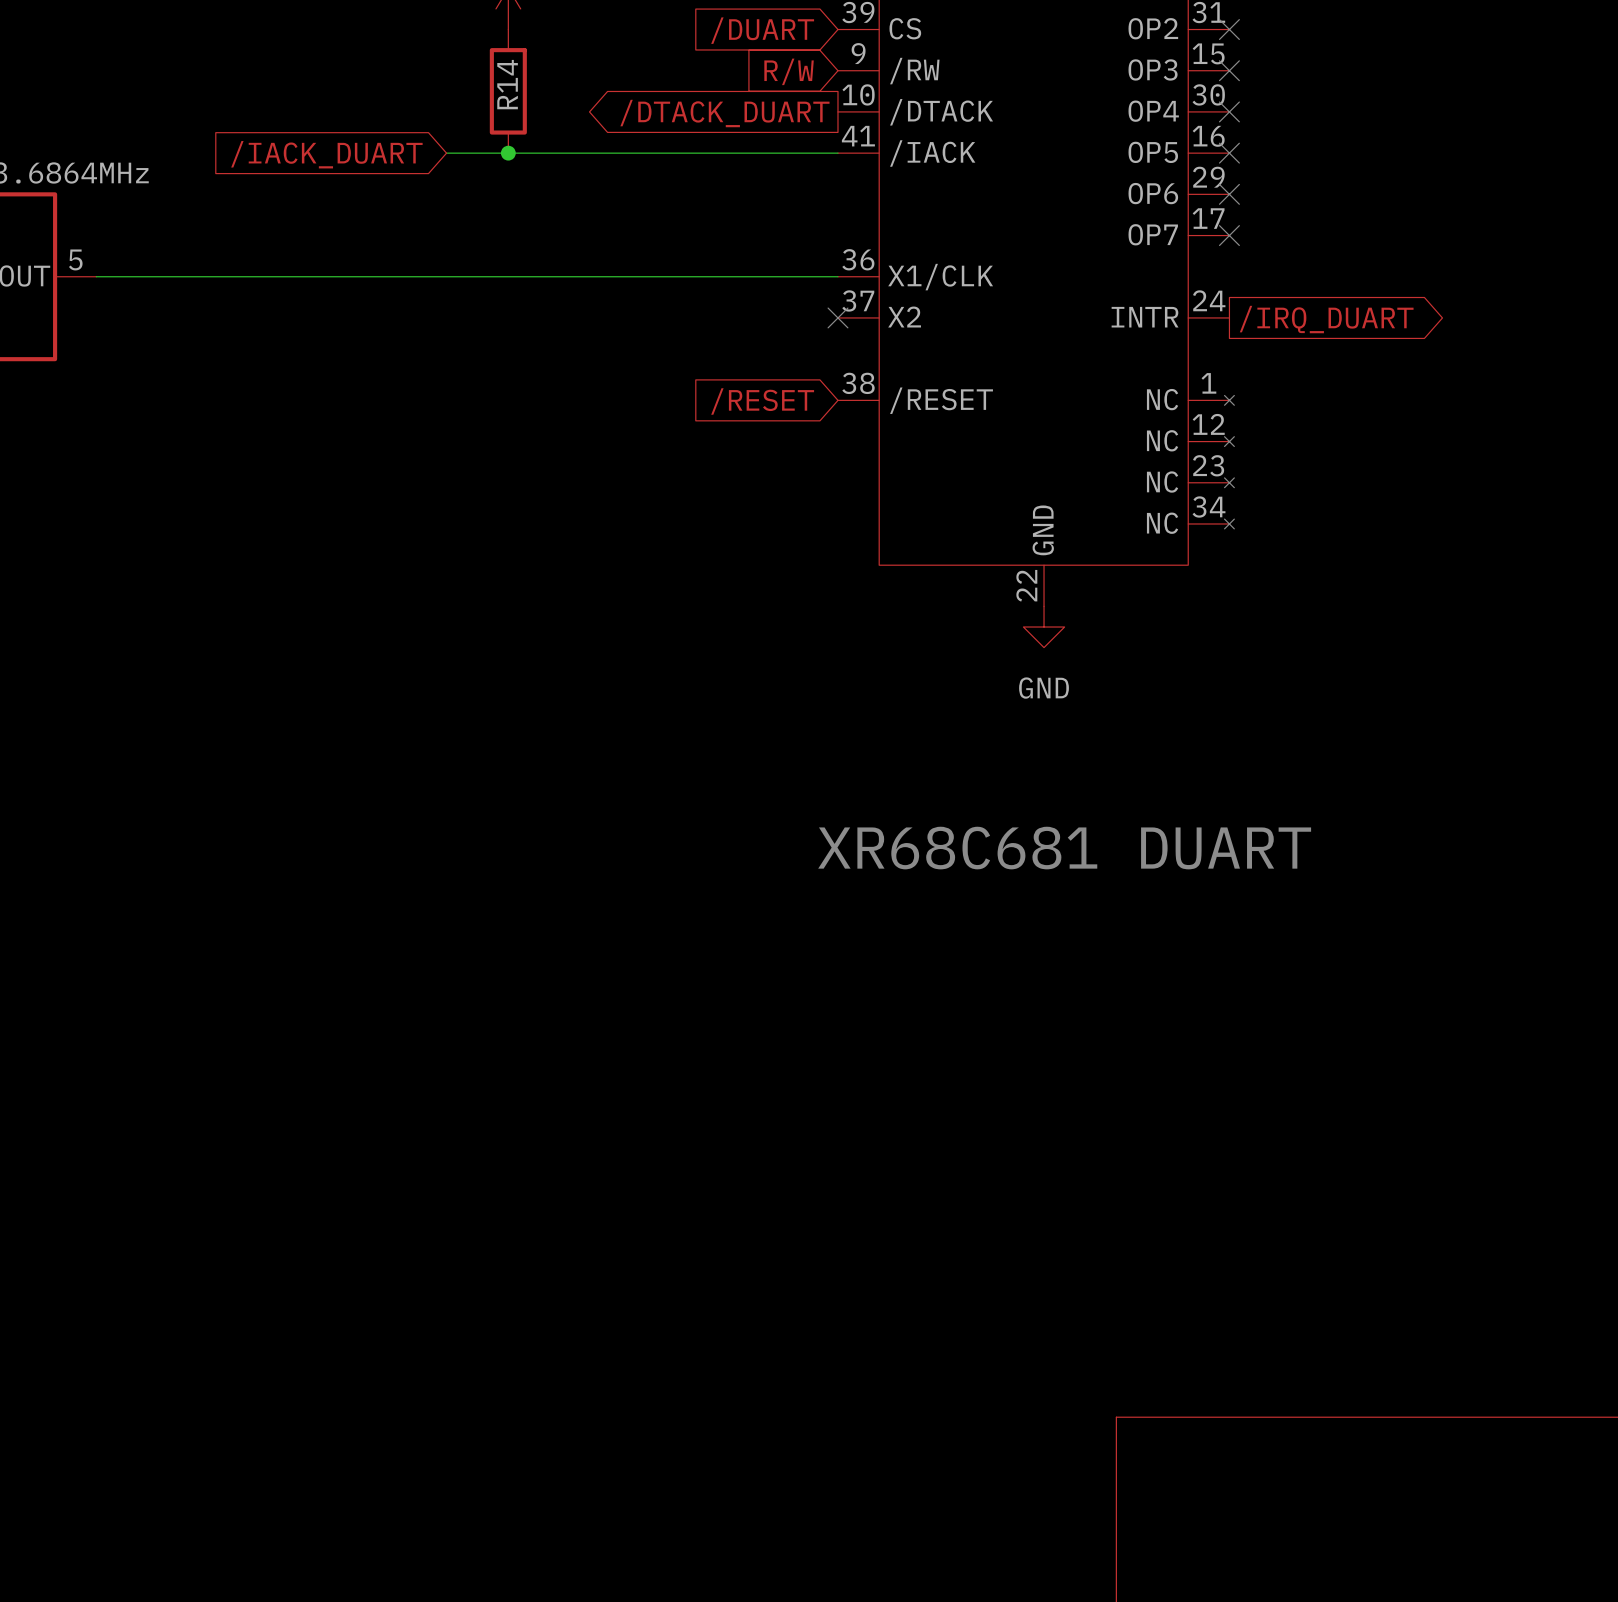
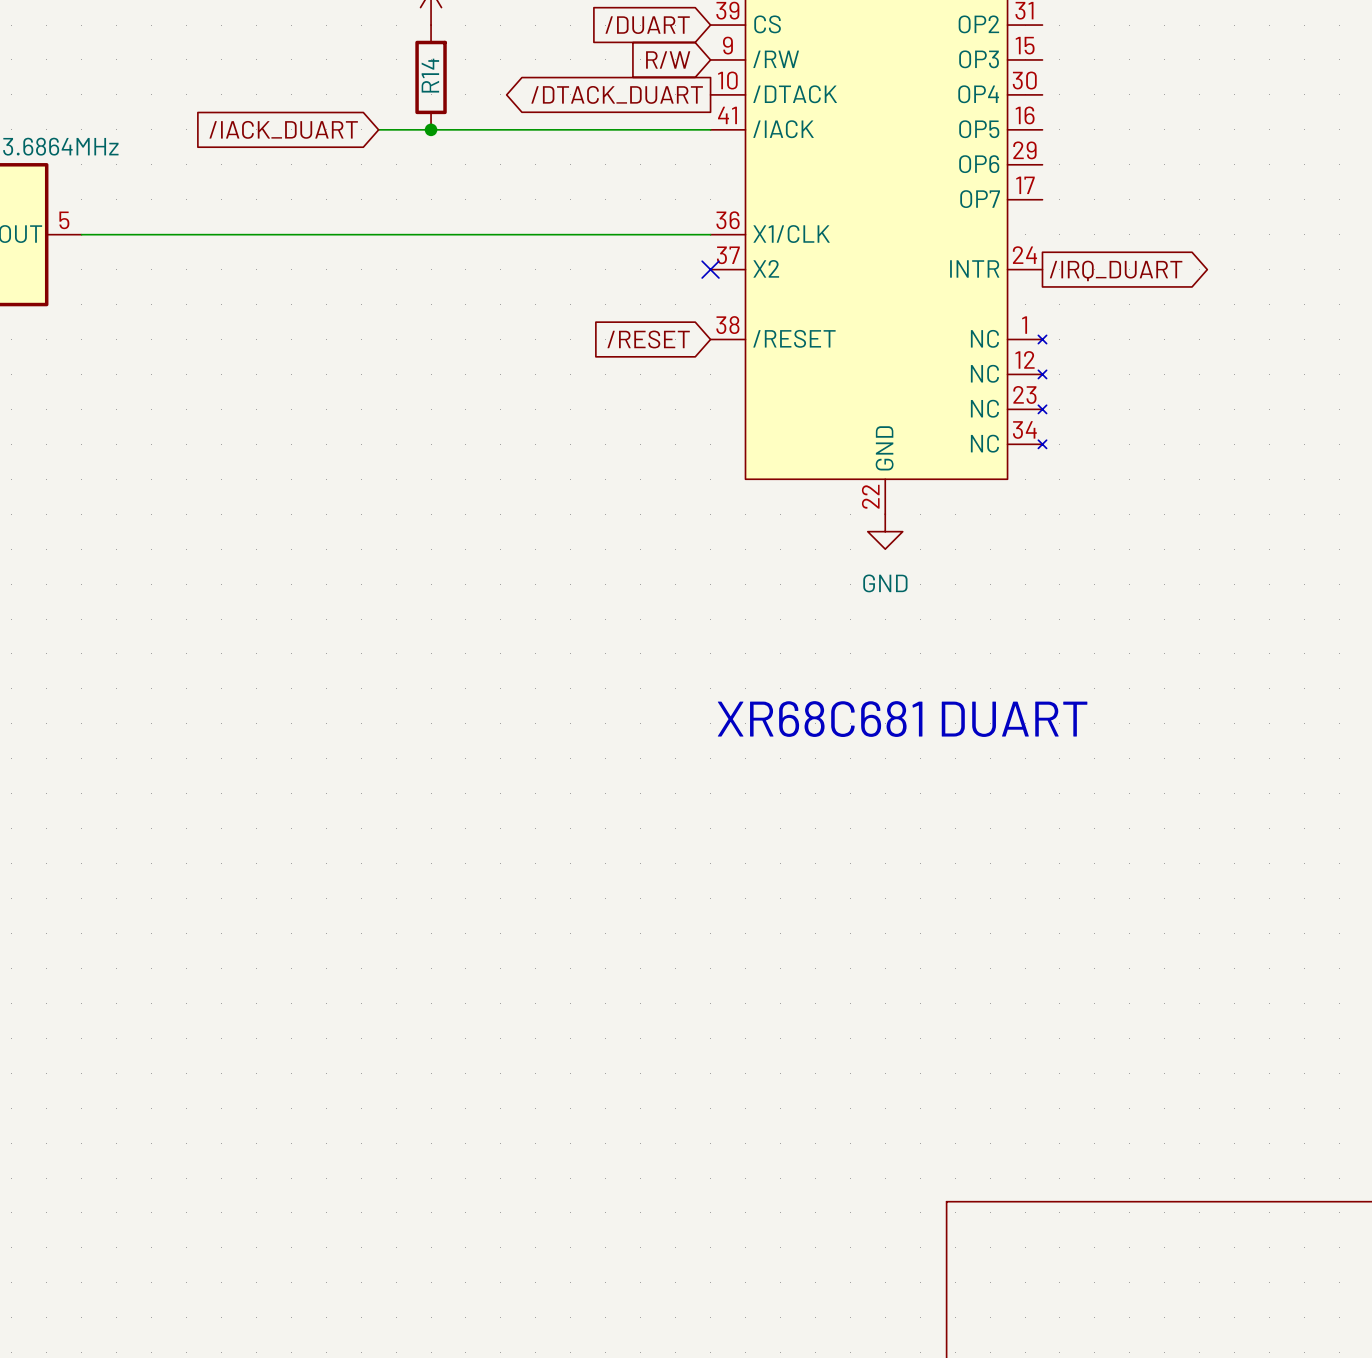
no-connect mark: (1229, 29) -> none
no-connect mark: (1229, 70) -> none
no-connect mark: (1229, 111) -> none
no-connect mark: (1229, 153) -> none
no-connect mark: (1229, 194) -> none
no-connect mark: (1229, 235) -> none

